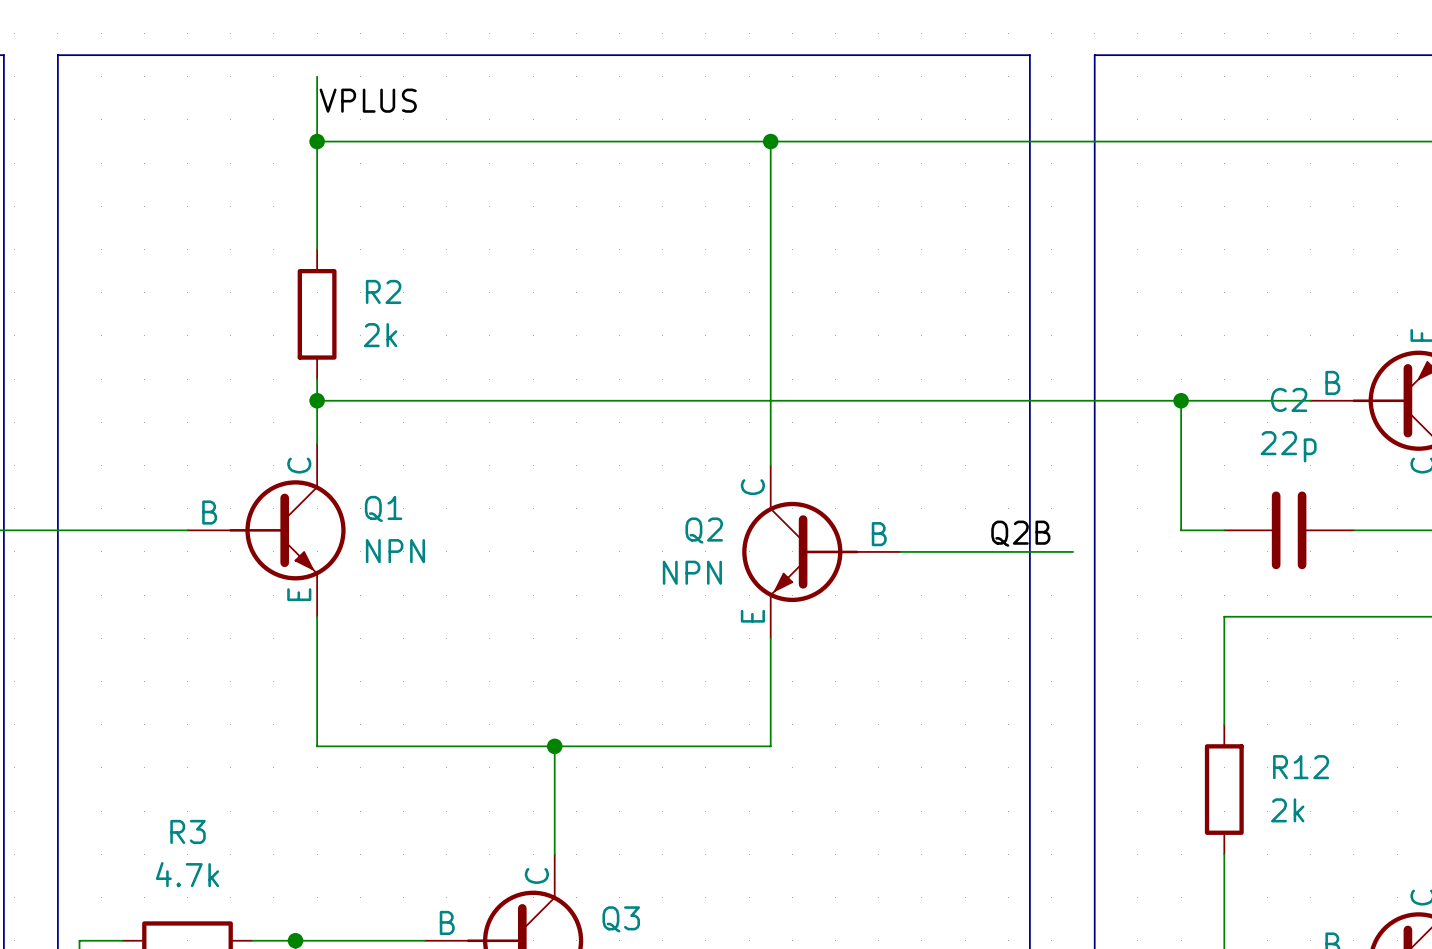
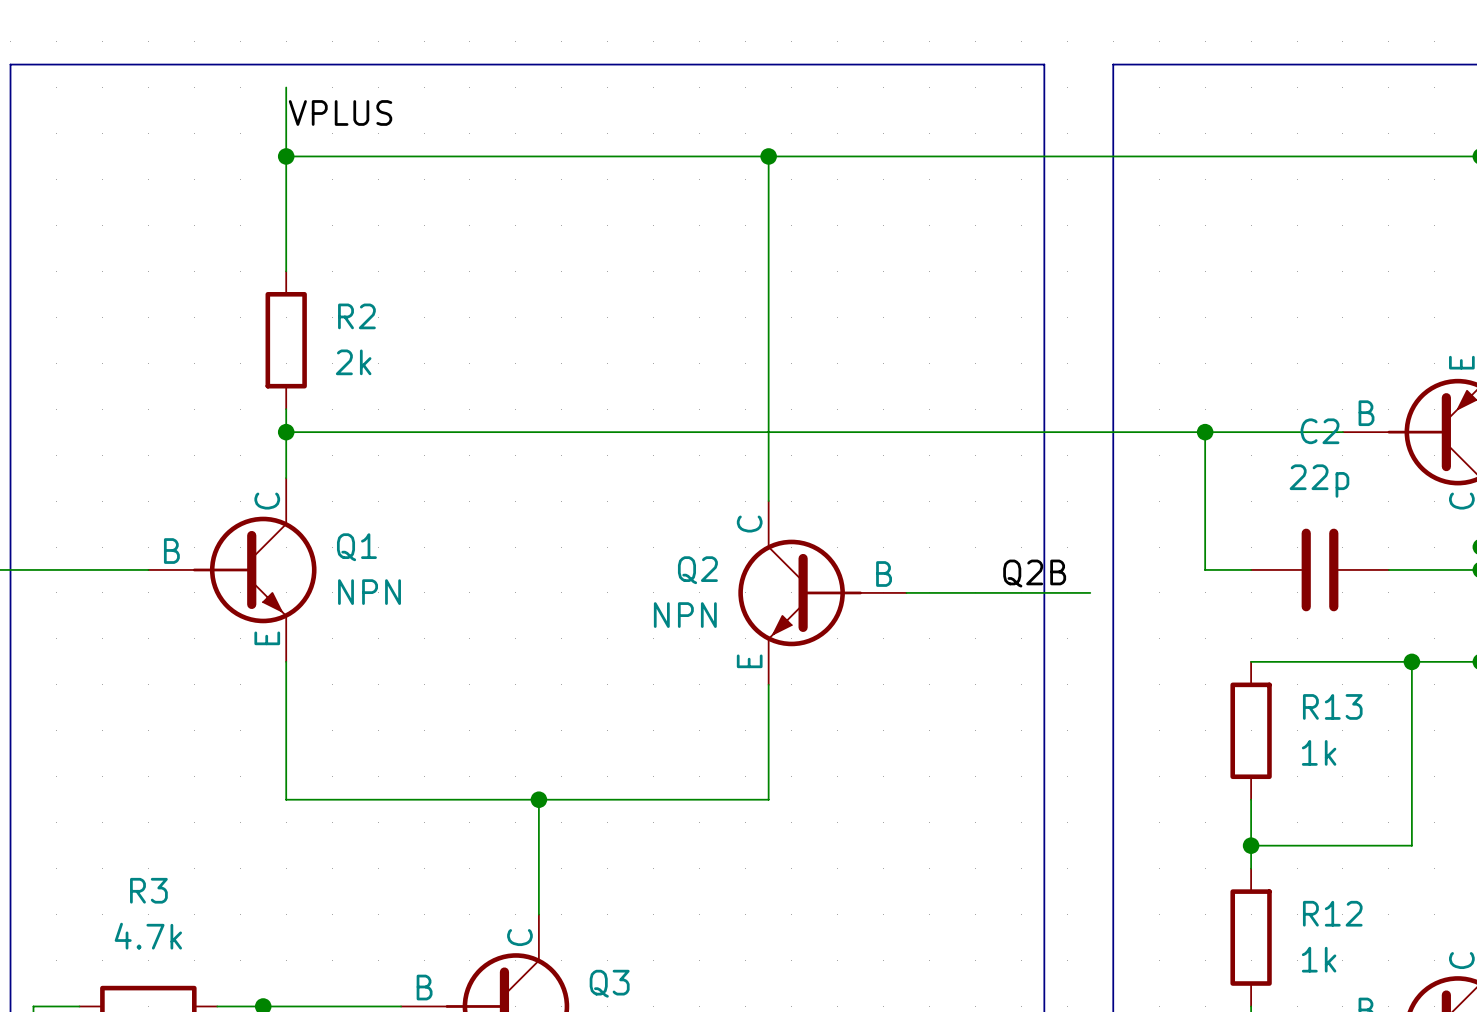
wire: (1224, 616) (1224, 724) -> none
wire: none -> (1411, 661) (1411, 845) (1251, 845)
junction: none -> (1411, 661)
R13: none -> 1k (1251, 730)
wire: none -> (1251, 799) (1251, 868)
R12 position: (1224, 789) -> (1251, 937)
junction: none -> (1251, 845)
R12 value: 2k (1287, 810) -> 1k (1319, 959)
wire: (1224, 854) (1224, 940) -> none

